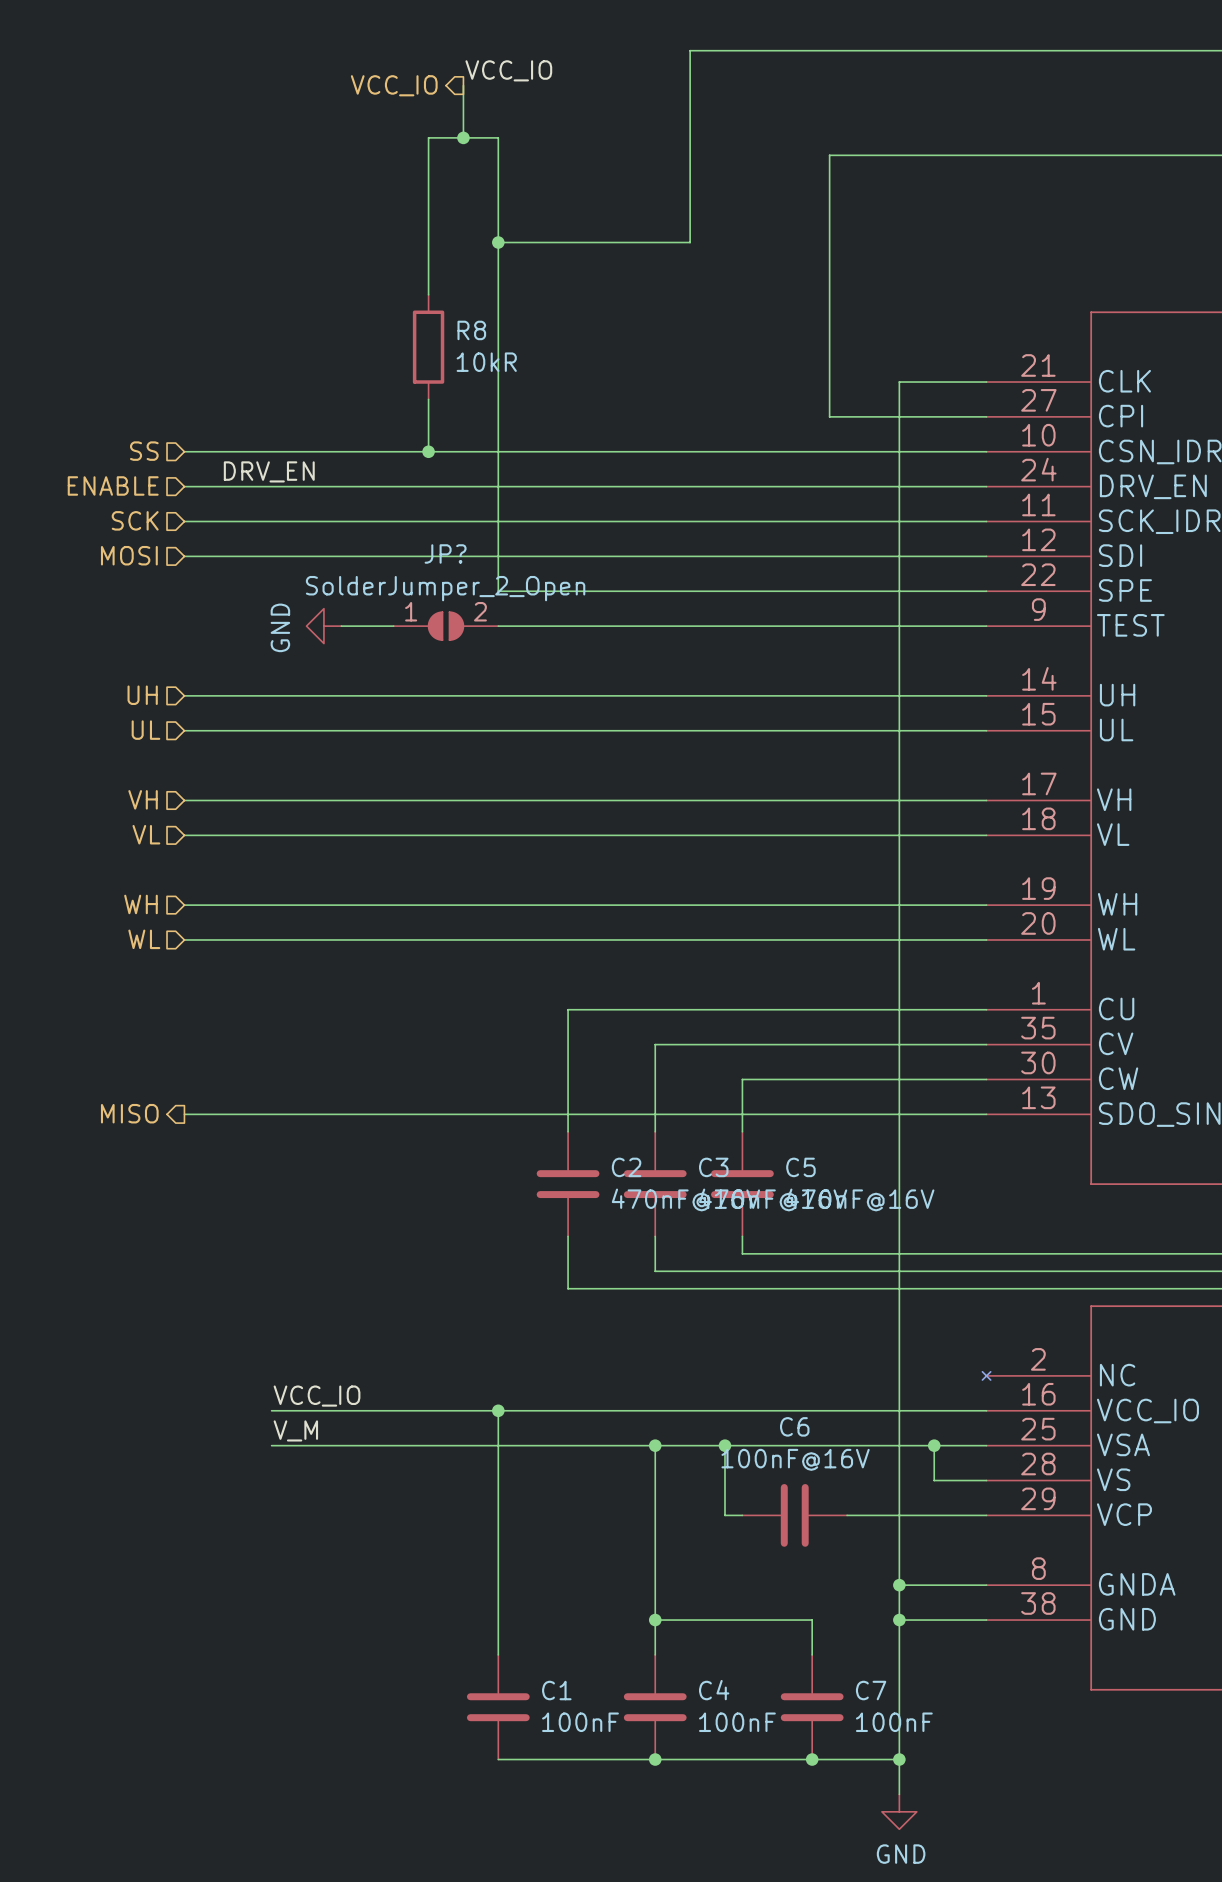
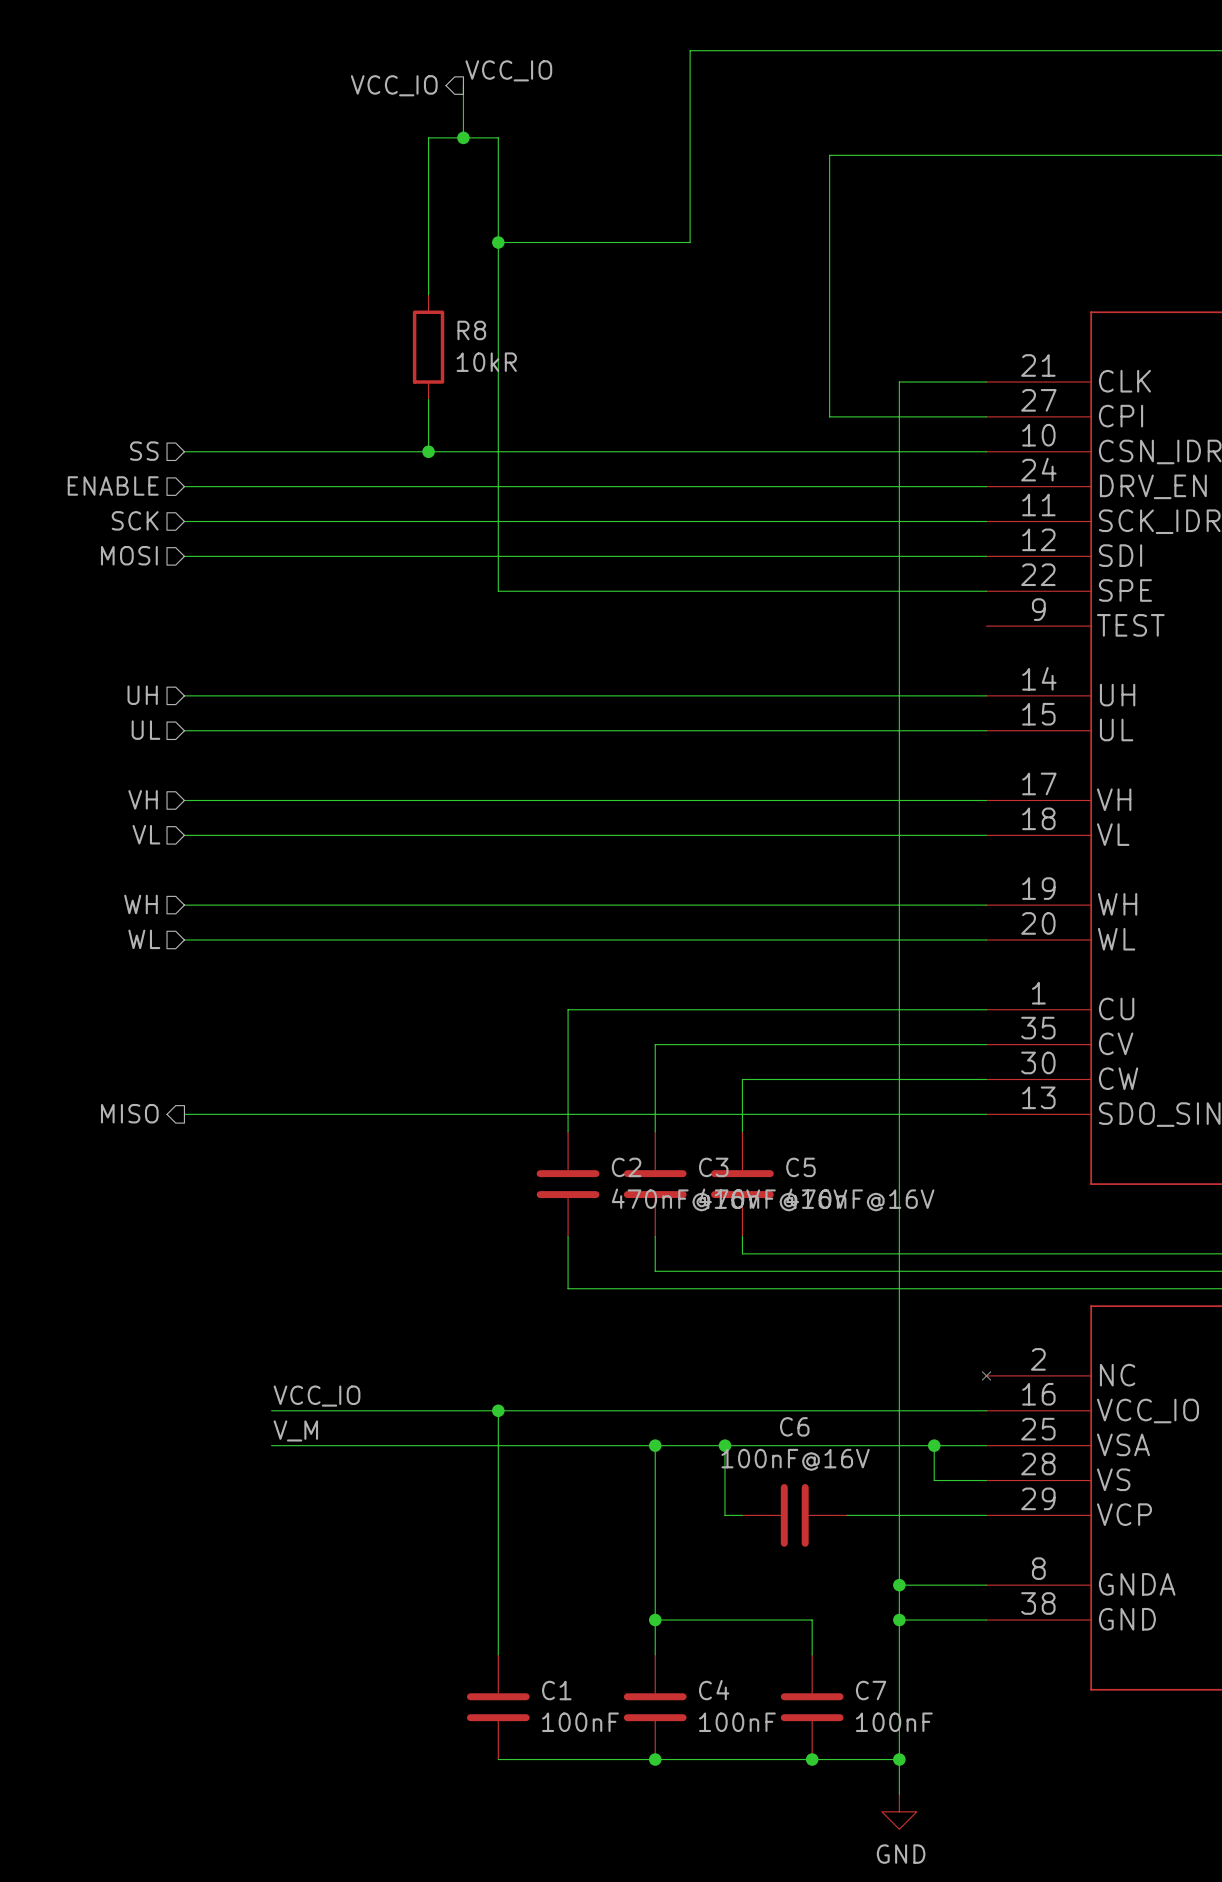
label: DRV_EN (269, 471) -> none
power symbol: GND (323, 626) -> none
wire: (341, 626) (393, 626) -> none
JP?: SolderJumper_2_Open (446, 626) -> none
wire: (498, 626) (986, 626) -> none

